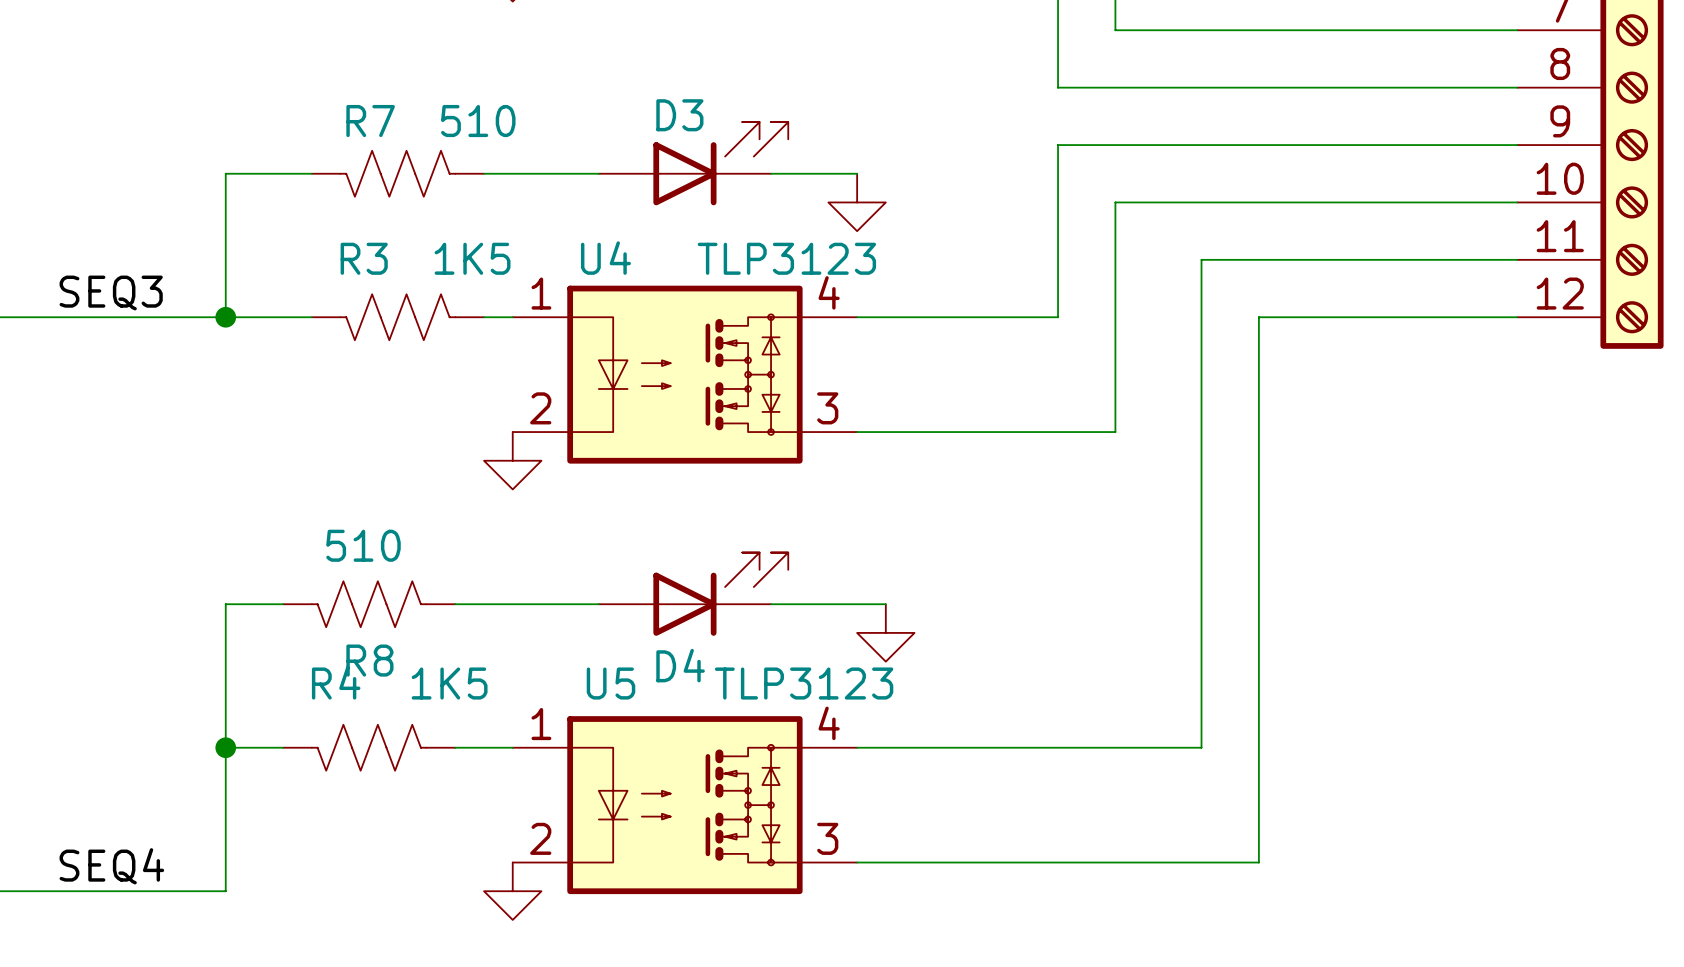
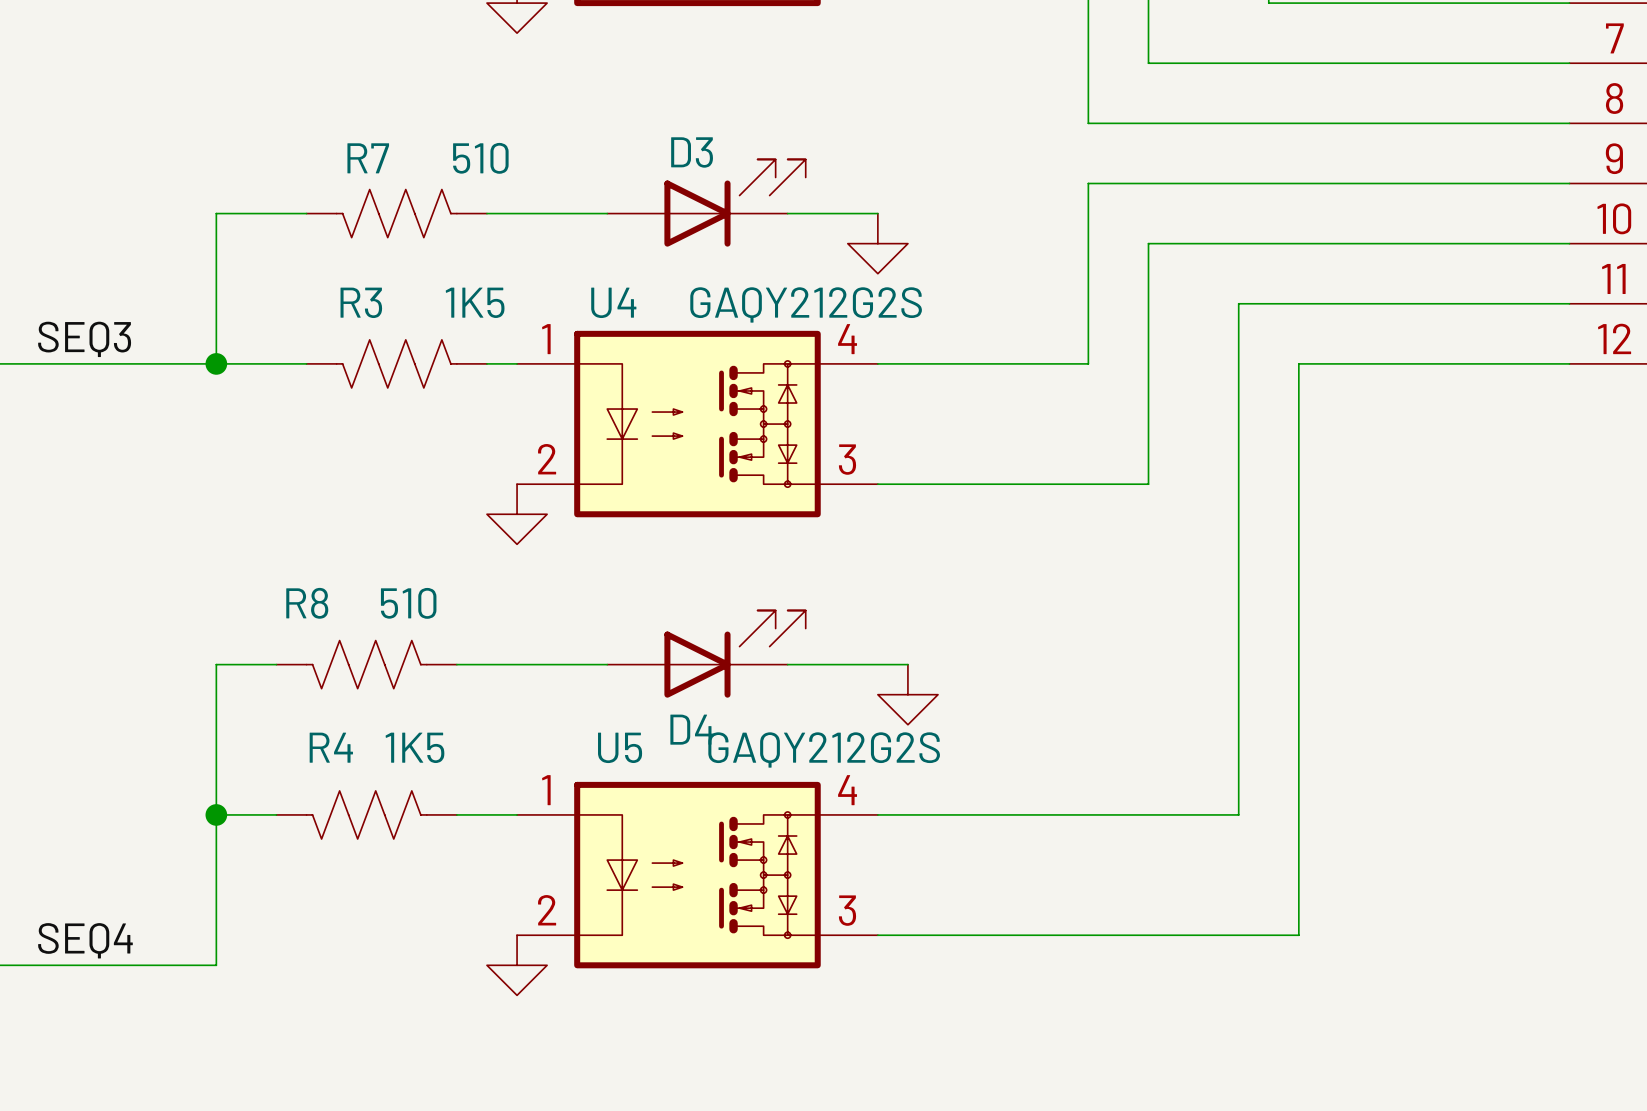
U4 value: TLP3123 (786, 258) -> GAQY212G2S (806, 304)
R8 value position: 510 (363, 545) -> 510 (408, 603)
R8 name position: R8 (369, 660) -> R8 (307, 603)
R4 value position: 1K5 (449, 683) -> 1K5 (414, 747)
U5 value: TLP3123 (804, 683) -> GAQY212G2S (824, 749)

